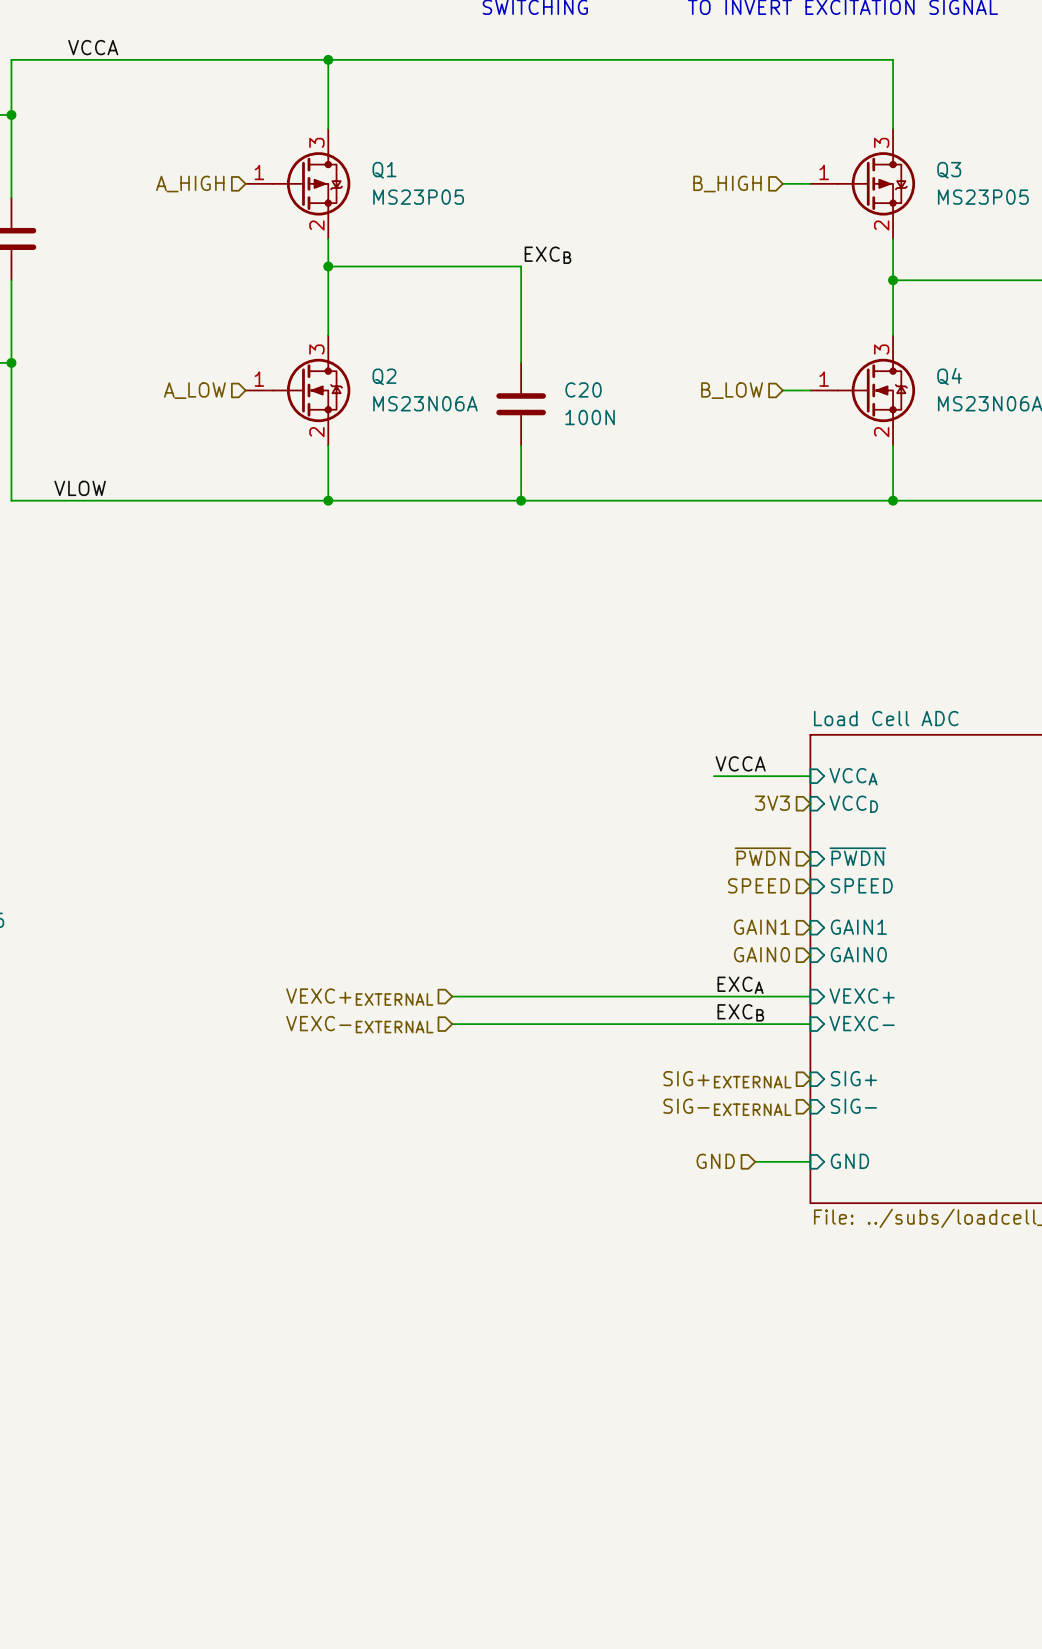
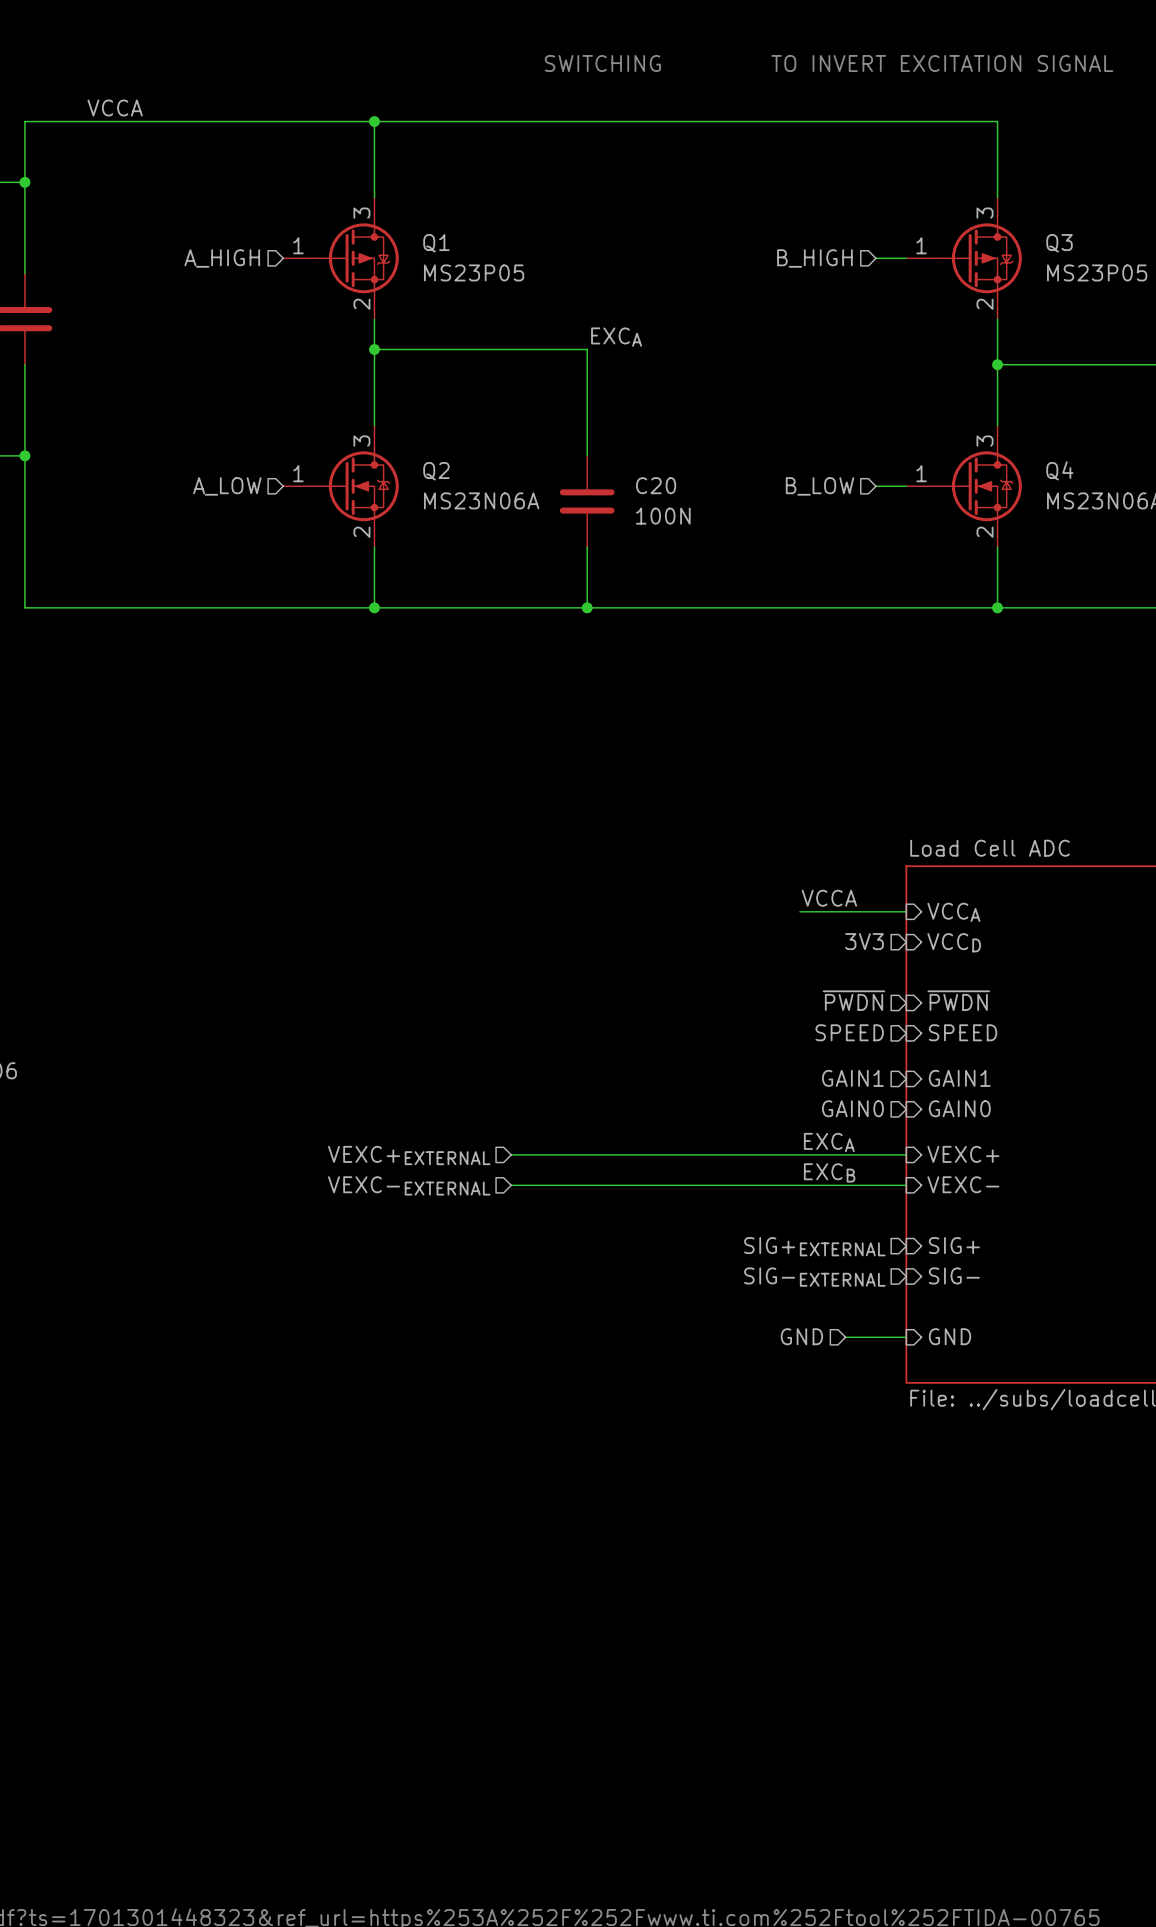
label: EXCB (547, 255) -> EXCA (616, 337)
label: VLOW (80, 488) -> none

